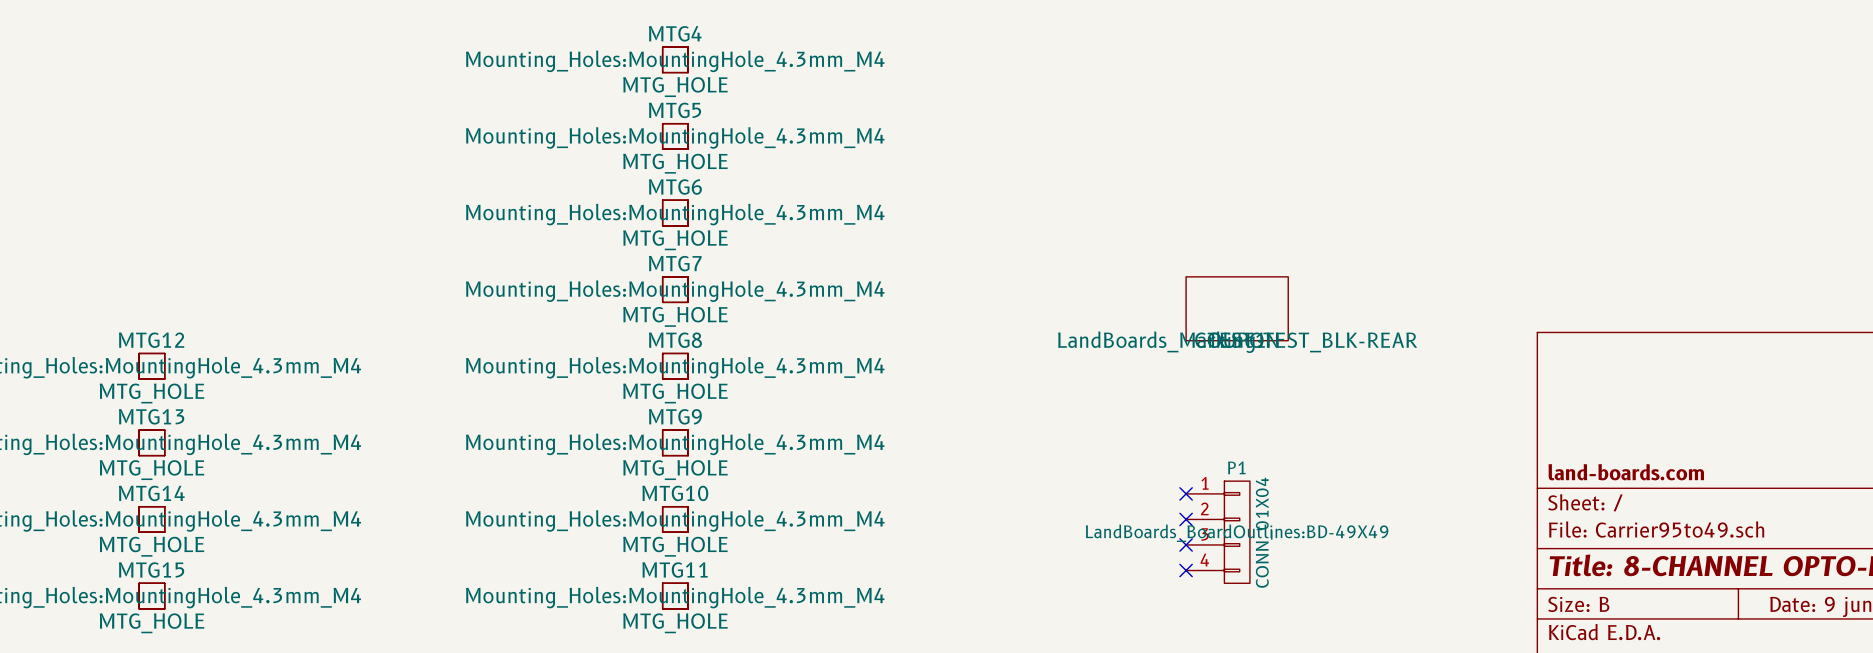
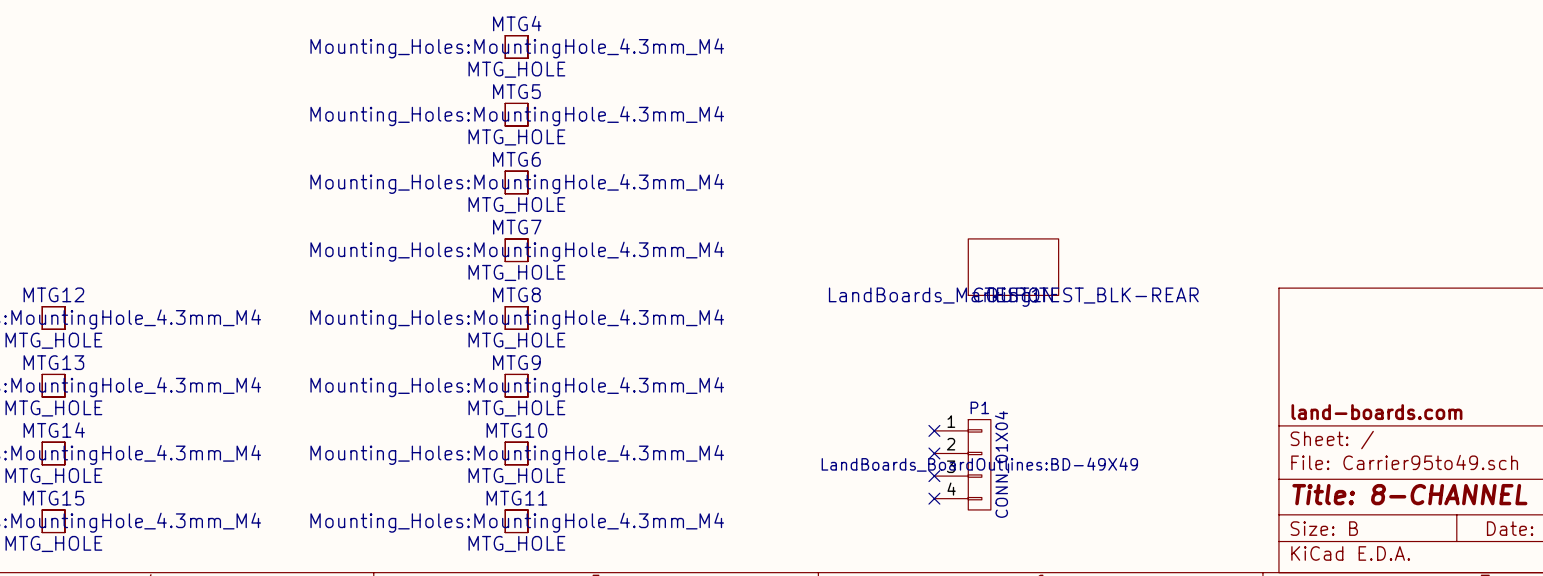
no-connect mark: none -> (934, 430)
no-connect mark: (1186, 493) -> none
no-connect mark: none -> (934, 453)
no-connect mark: (1186, 519) -> none
P1 position: (1218, 532) -> (962, 464)
no-connect mark: none -> (934, 476)
no-connect mark: (1186, 544) -> none
no-connect mark: none -> (934, 498)
no-connect mark: (1186, 570) -> none

